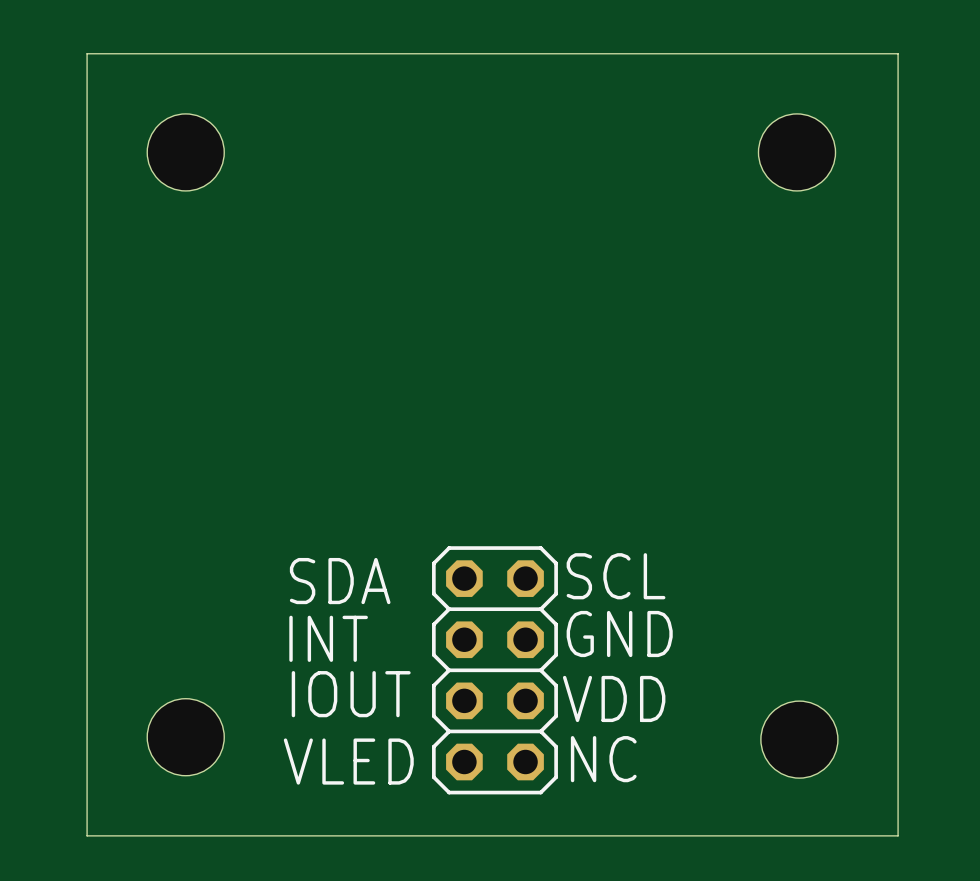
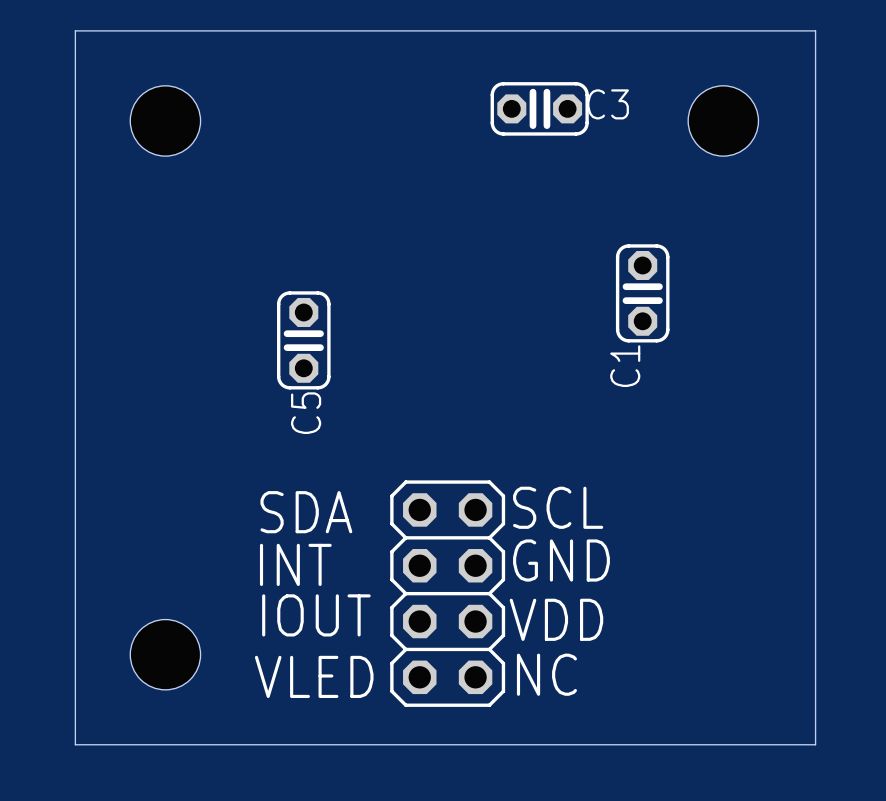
C3: none -> (539, 108)
C1: none -> (642, 293)
C5: none -> (303, 340)
part: (799, 739) -> none

